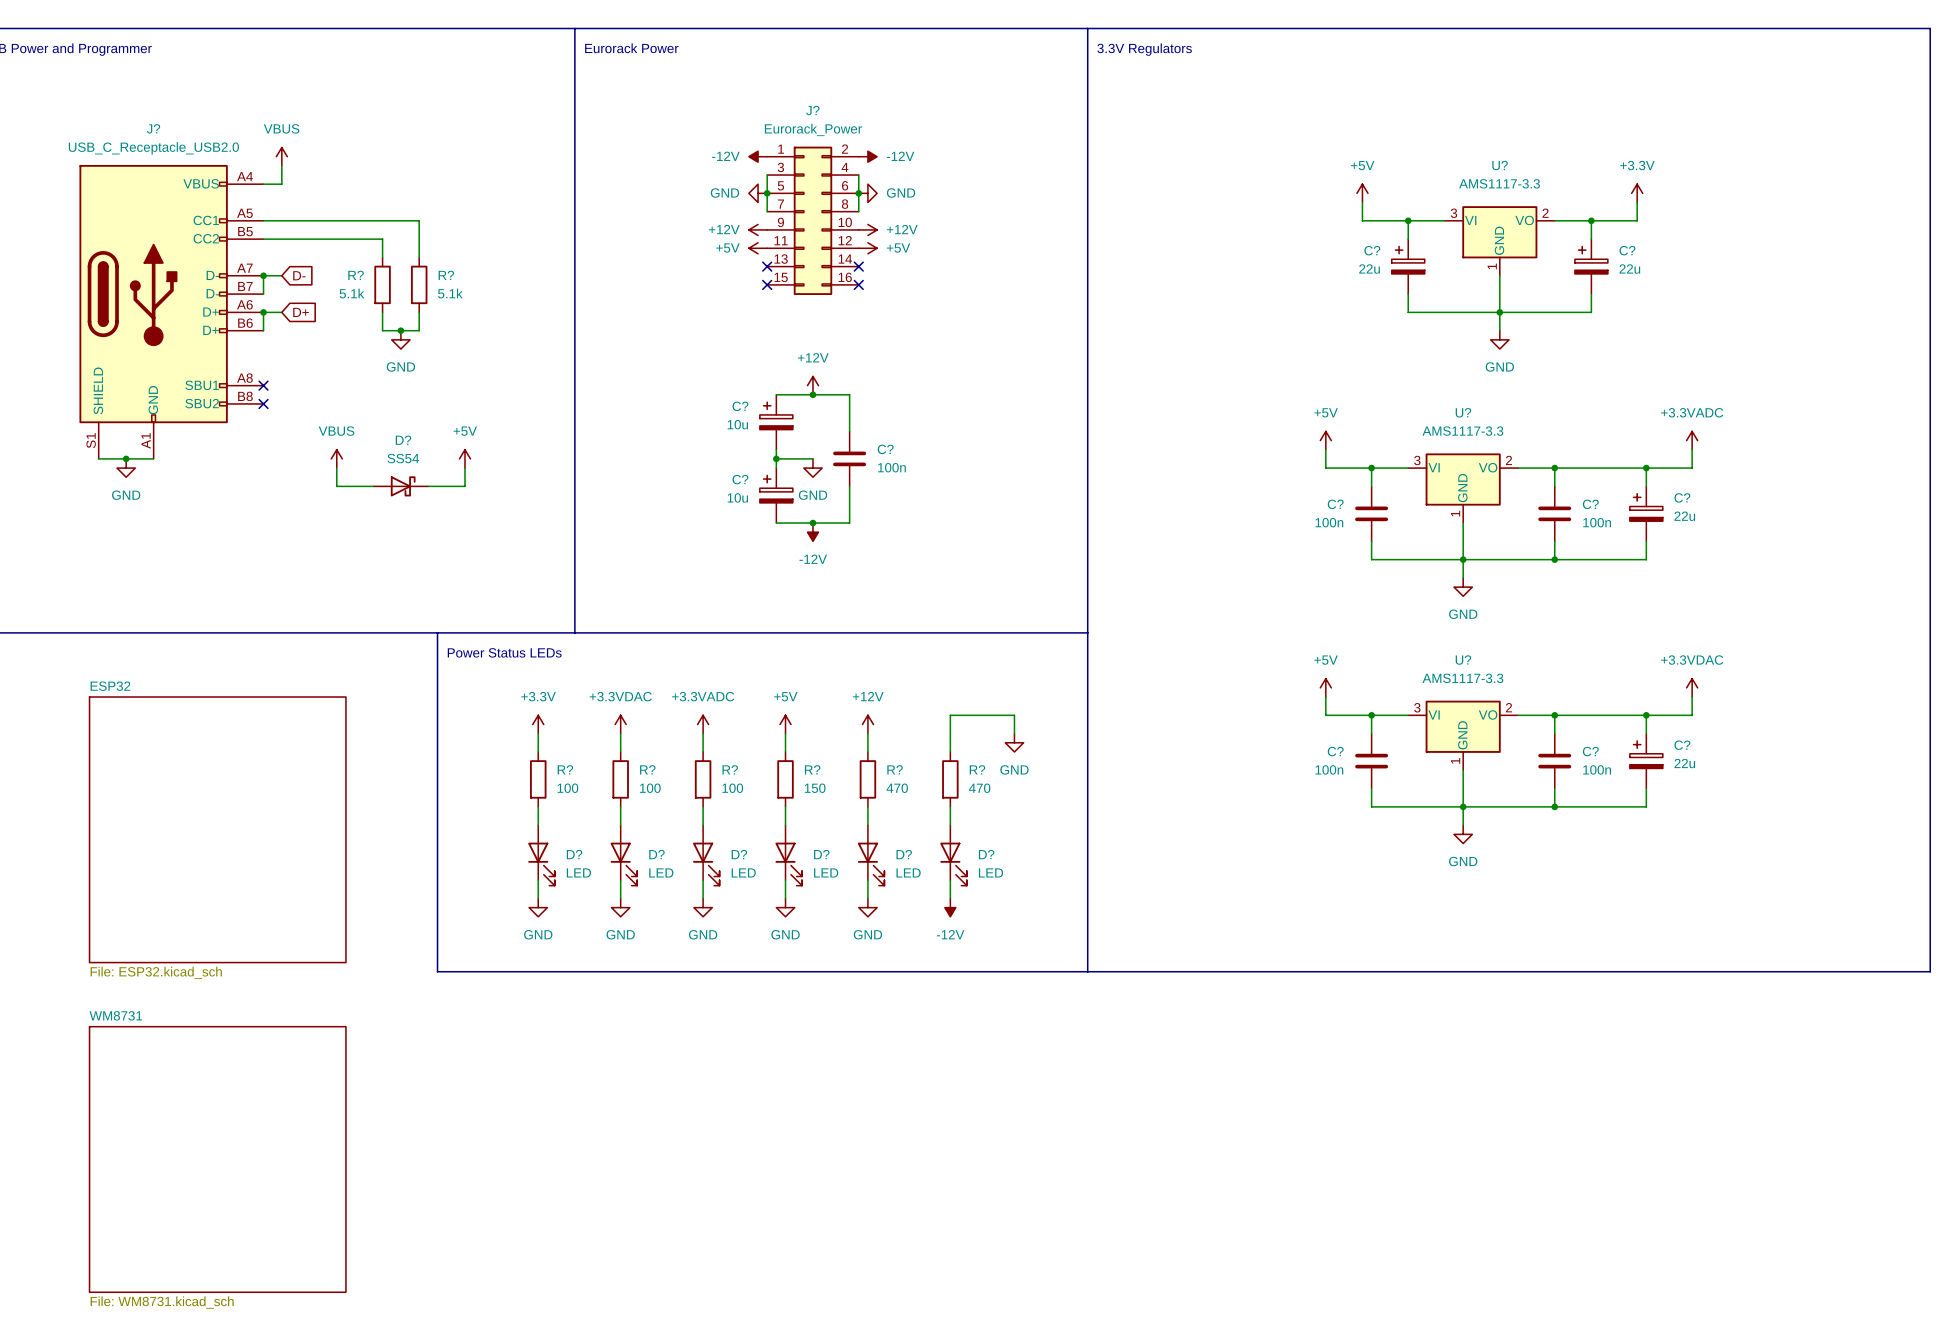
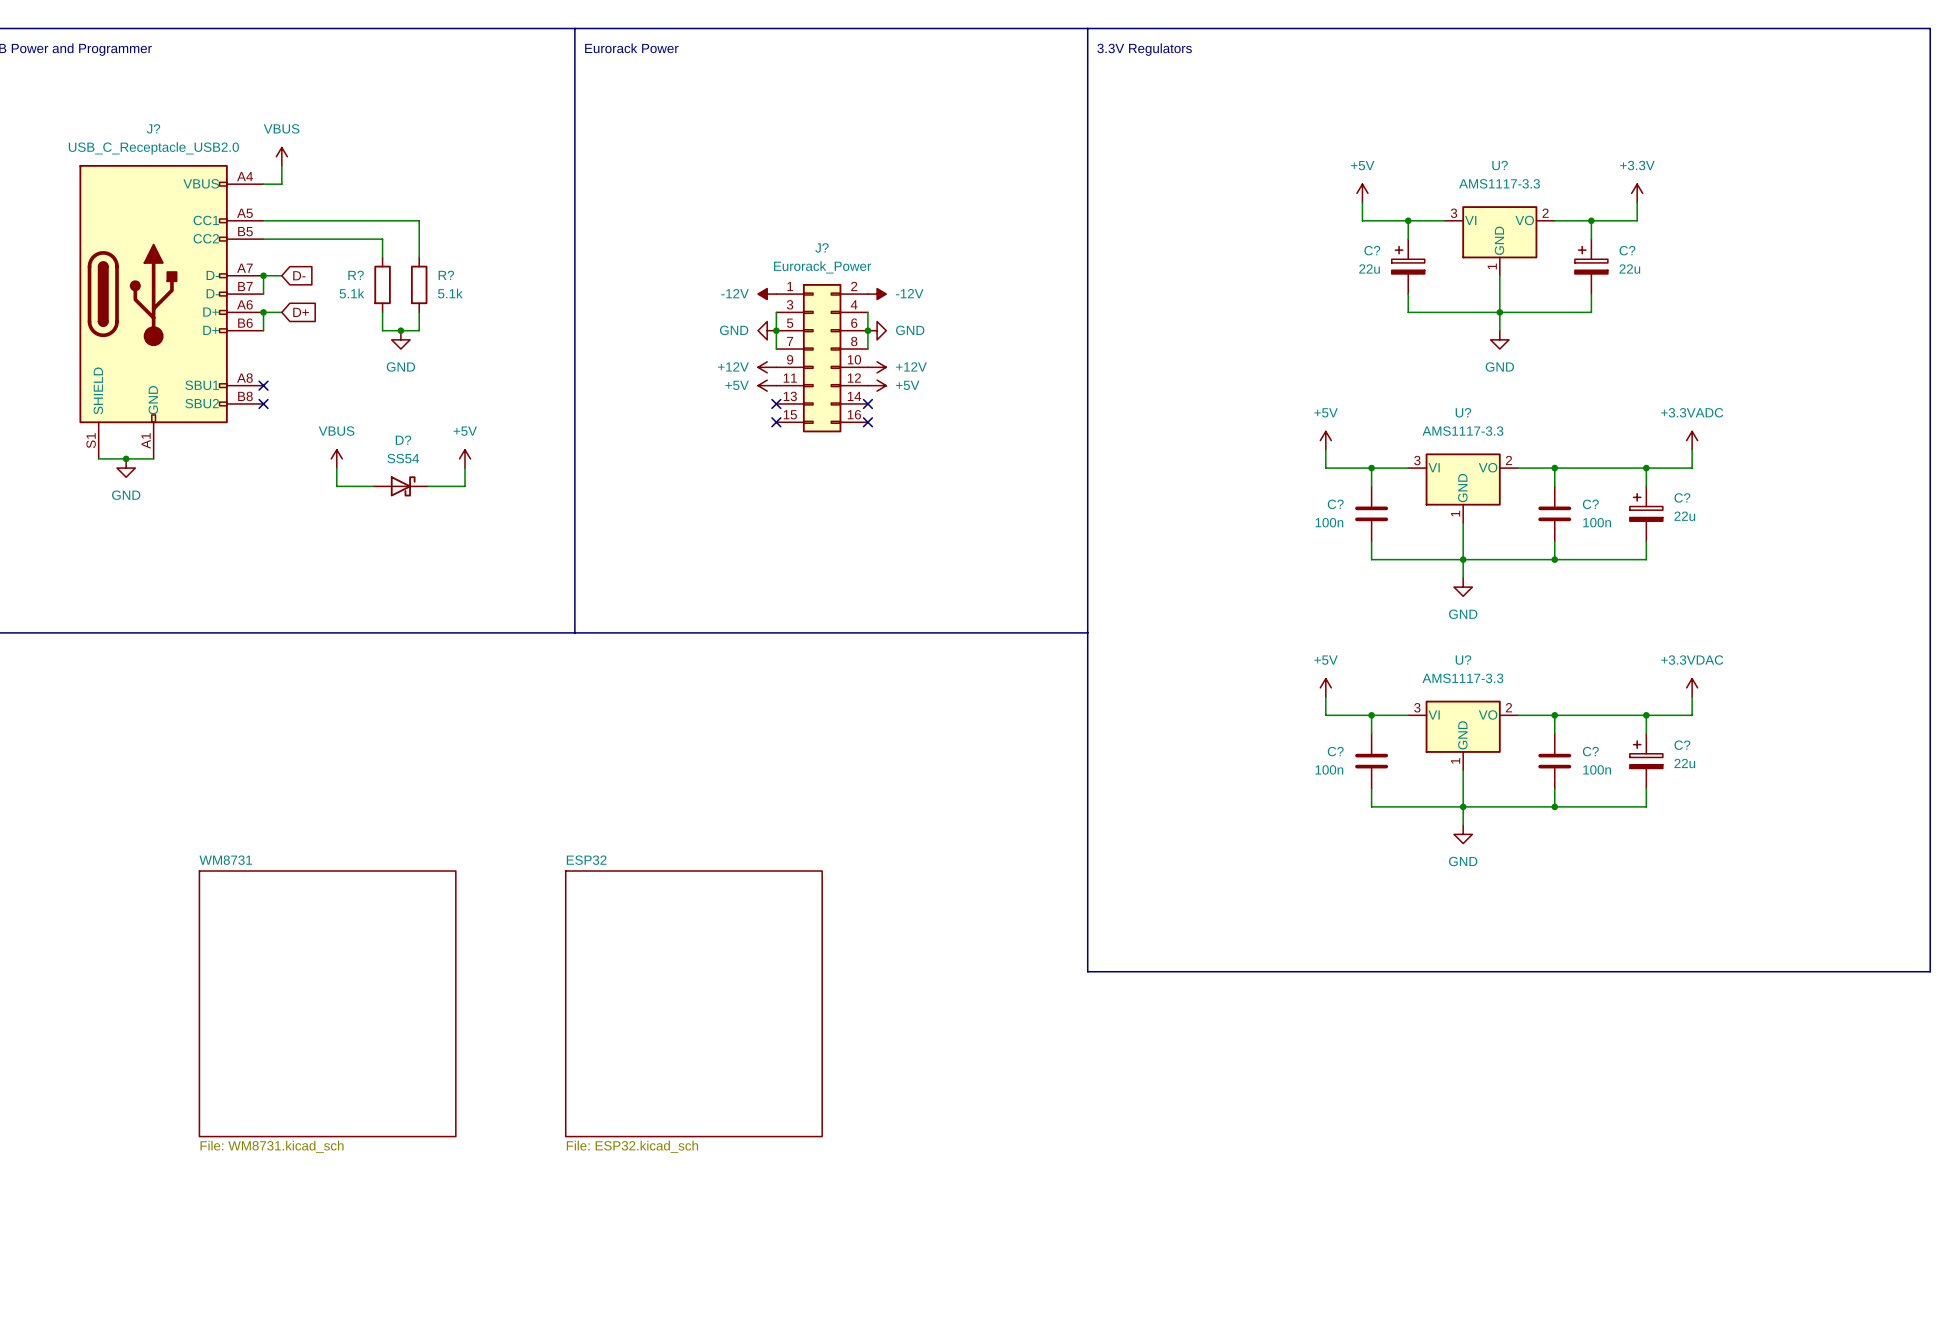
power symbol: -12V (758, 156) -> none
power symbol: -12V (867, 156) -> none
wire: (767, 175) (767, 211) -> (776, 312) (776, 349)
wire: (858, 175) (858, 211) -> (867, 312) (867, 349)
power symbol: GND (758, 193) -> none
junction: (767, 193) -> none
junction: (858, 193) -> none
power symbol: GND (867, 193) -> none
J? position: (812, 220) -> (822, 358)
power symbol: +12V (758, 229) -> none
power symbol: +12V (867, 229) -> none
power symbol: +5V (758, 248) -> none
power symbol: +5V (867, 248) -> none
no-connect mark: (767, 266) -> none
no-connect mark: (858, 266) -> none
no-connect mark: (767, 284) -> none
no-connect mark: (858, 284) -> none
power symbol: none -> -12V (767, 294)
power symbol: none -> -12V (877, 294)
power symbol: none -> GND (767, 330)
junction: none -> (776, 330)
junction: none -> (867, 330)
power symbol: none -> GND (877, 330)
power symbol: none -> +12V (767, 367)
power symbol: none -> +12V (877, 367)
power symbol: none -> +5V (767, 385)
power symbol: +12V (812, 385) -> none
power symbol: none -> +5V (877, 385)
wire: (776, 394) (849, 394) (849, 431) -> none
junction: (812, 394) -> none
no-connect mark: none -> (776, 403)
no-connect mark: none -> (867, 403)
no-connect mark: none -> (776, 422)
C?: 10u (776, 422) -> none
no-connect mark: none -> (867, 422)
wire: (776, 449) (776, 468) -> none
wire: (776, 458) (812, 458) -> none
junction: (776, 458) -> none
C?: 100n (849, 458) -> none
power symbol: GND (812, 468) -> none
wire: (849, 486) (849, 523) (776, 523) -> none
C?: 10u (776, 495) -> none
junction: (812, 523) -> none
power symbol: -12V (812, 532) -> none
line: (437, 632) (437, 971) (1087, 971) -> none
text: Power Status LEDs (504, 652) -> none
power symbol: +3.3V (538, 724) -> none
power symbol: +3.3VDAC (620, 724) -> none
power symbol: +3.3VADC (703, 724) -> none
power symbol: +5V (785, 724) -> none
power symbol: +12V (867, 724) -> none
wire: (538, 733) (538, 751) -> none
wire: (620, 733) (620, 751) -> none
wire: (703, 733) (703, 751) -> none
wire: (785, 733) (785, 751) -> none
wire: (867, 733) (867, 751) -> none
wire: (1014, 733) (1014, 715) (950, 715) (950, 751) -> none
power symbol: GND (1014, 742) -> none
R?: 100 (538, 779) -> none
R?: 100 (620, 779) -> none
R?: 100 (703, 779) -> none
R?: 150 (785, 779) -> none
R?: 470 (867, 779) -> none
R?: 470 (950, 779) -> none
wire: (538, 806) (538, 825) -> none
wire: (620, 806) (620, 825) -> none
wire: (703, 806) (703, 825) -> none
wire: (785, 806) (785, 825) -> none
wire: (867, 806) (867, 825) -> none
wire: (950, 806) (950, 825) -> none
sheet ESP32 position: (217, 829) -> (693, 1003)
D?: LED (541, 855) -> none
D?: LED (623, 855) -> none
D?: LED (706, 855) -> none
D?: LED (788, 855) -> none
D?: LED (871, 855) -> none
D?: LED (953, 855) -> none
wire: (538, 880) (538, 898) -> none
wire: (620, 880) (620, 898) -> none
wire: (703, 880) (703, 898) -> none
wire: (785, 880) (785, 898) -> none
wire: (867, 880) (867, 898) -> none
wire: (950, 880) (950, 898) -> none
power symbol: GND (538, 907) -> none
power symbol: GND (620, 907) -> none
power symbol: GND (703, 907) -> none
power symbol: GND (785, 907) -> none
power symbol: GND (867, 907) -> none
power symbol: -12V (950, 907) -> none
sheet WM8731 position: (217, 1159) -> (327, 1003)

